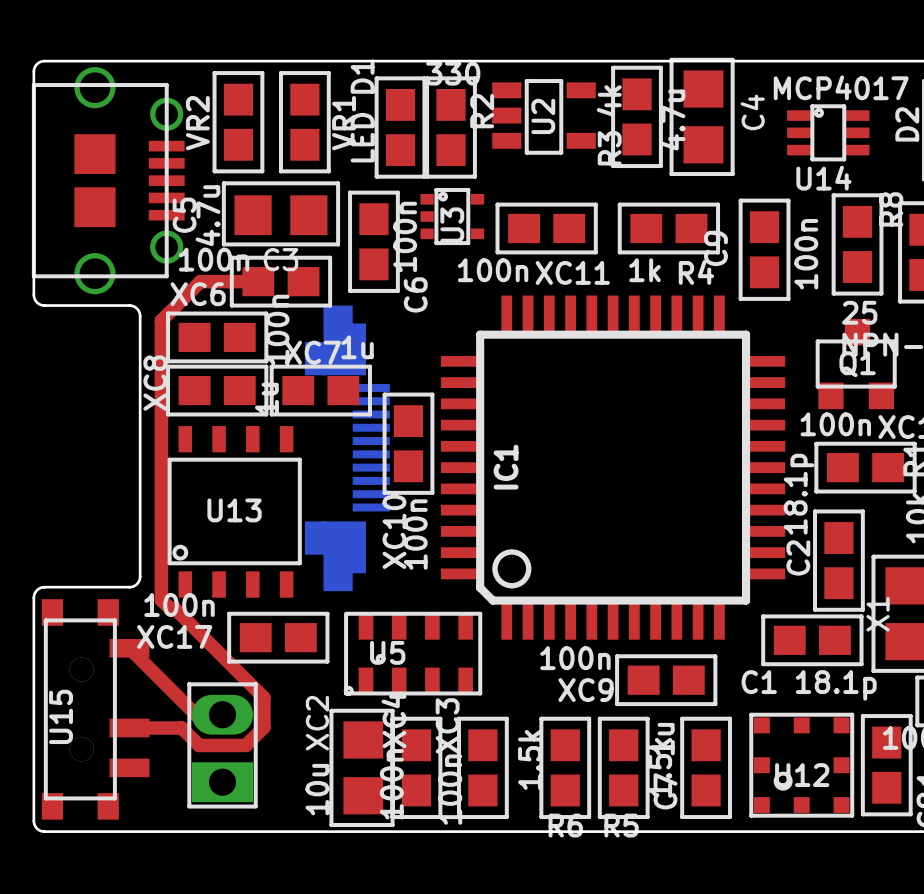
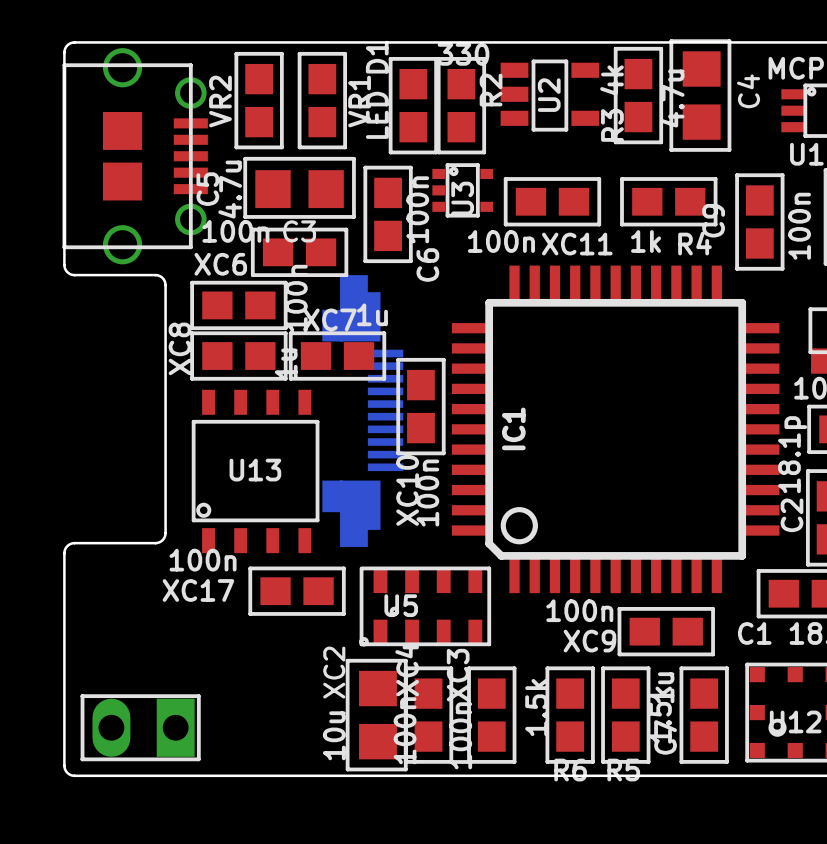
top track: (258, 281) (200, 281) (161, 320) (161, 599) (169, 608) (174, 608) (263, 697) (263, 727) (245, 745) (199, 745) (181, 728) (129, 728) -> none
top track: (129, 648) (195, 714) (222, 714) -> none
U15: (95, 709) -> none
part rotation: 0° (222, 745) -> 90° counterclockwise (140, 727)
part position: (222, 745) -> (140, 727)

